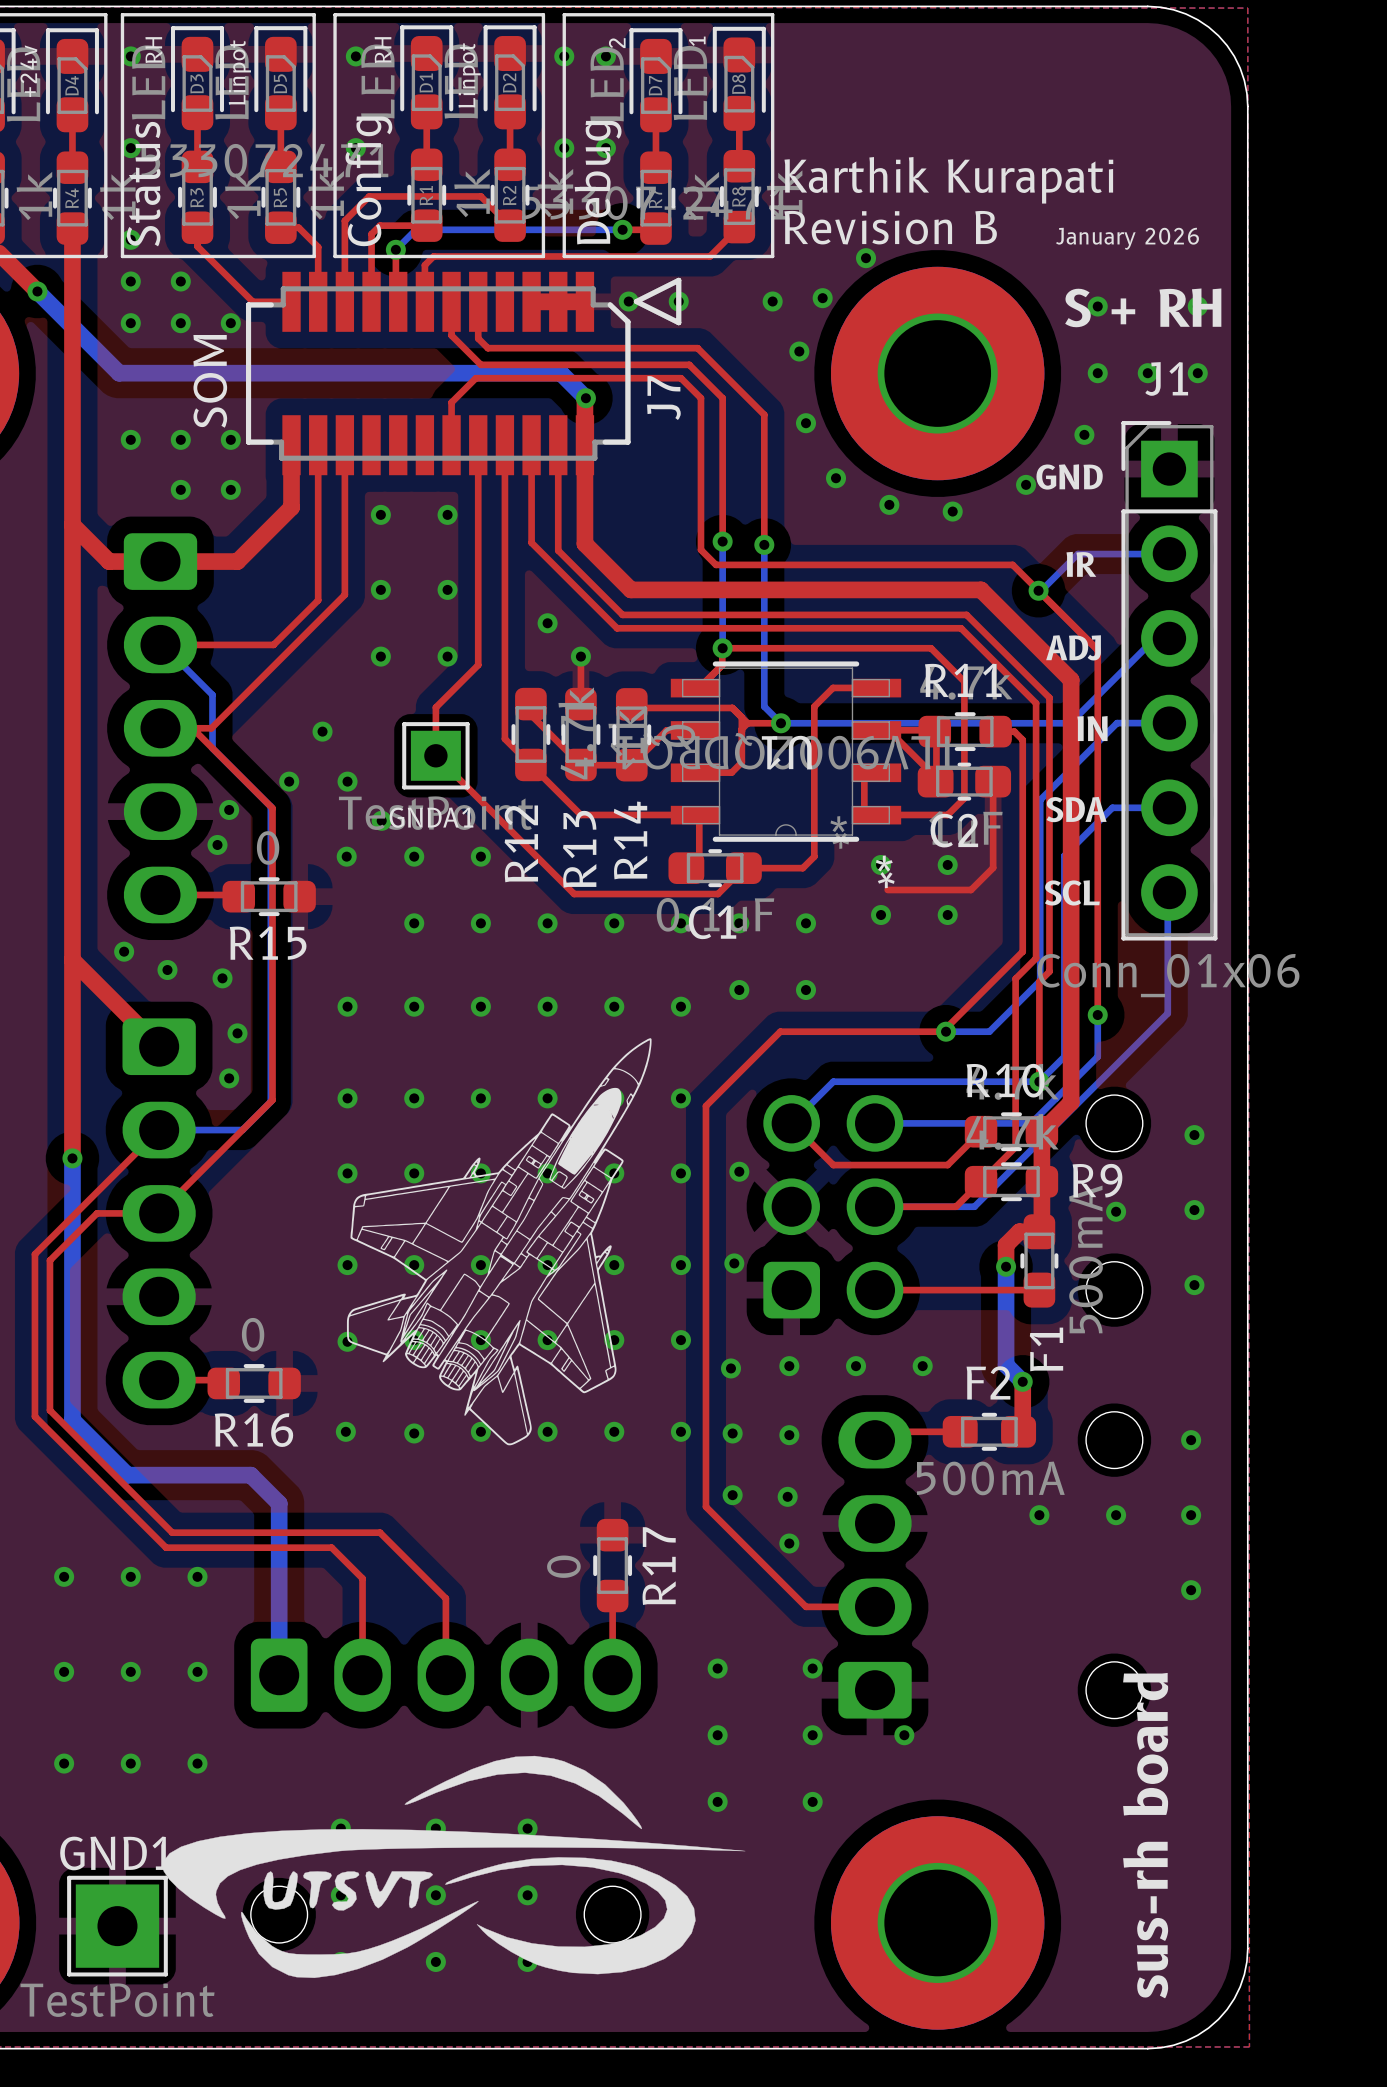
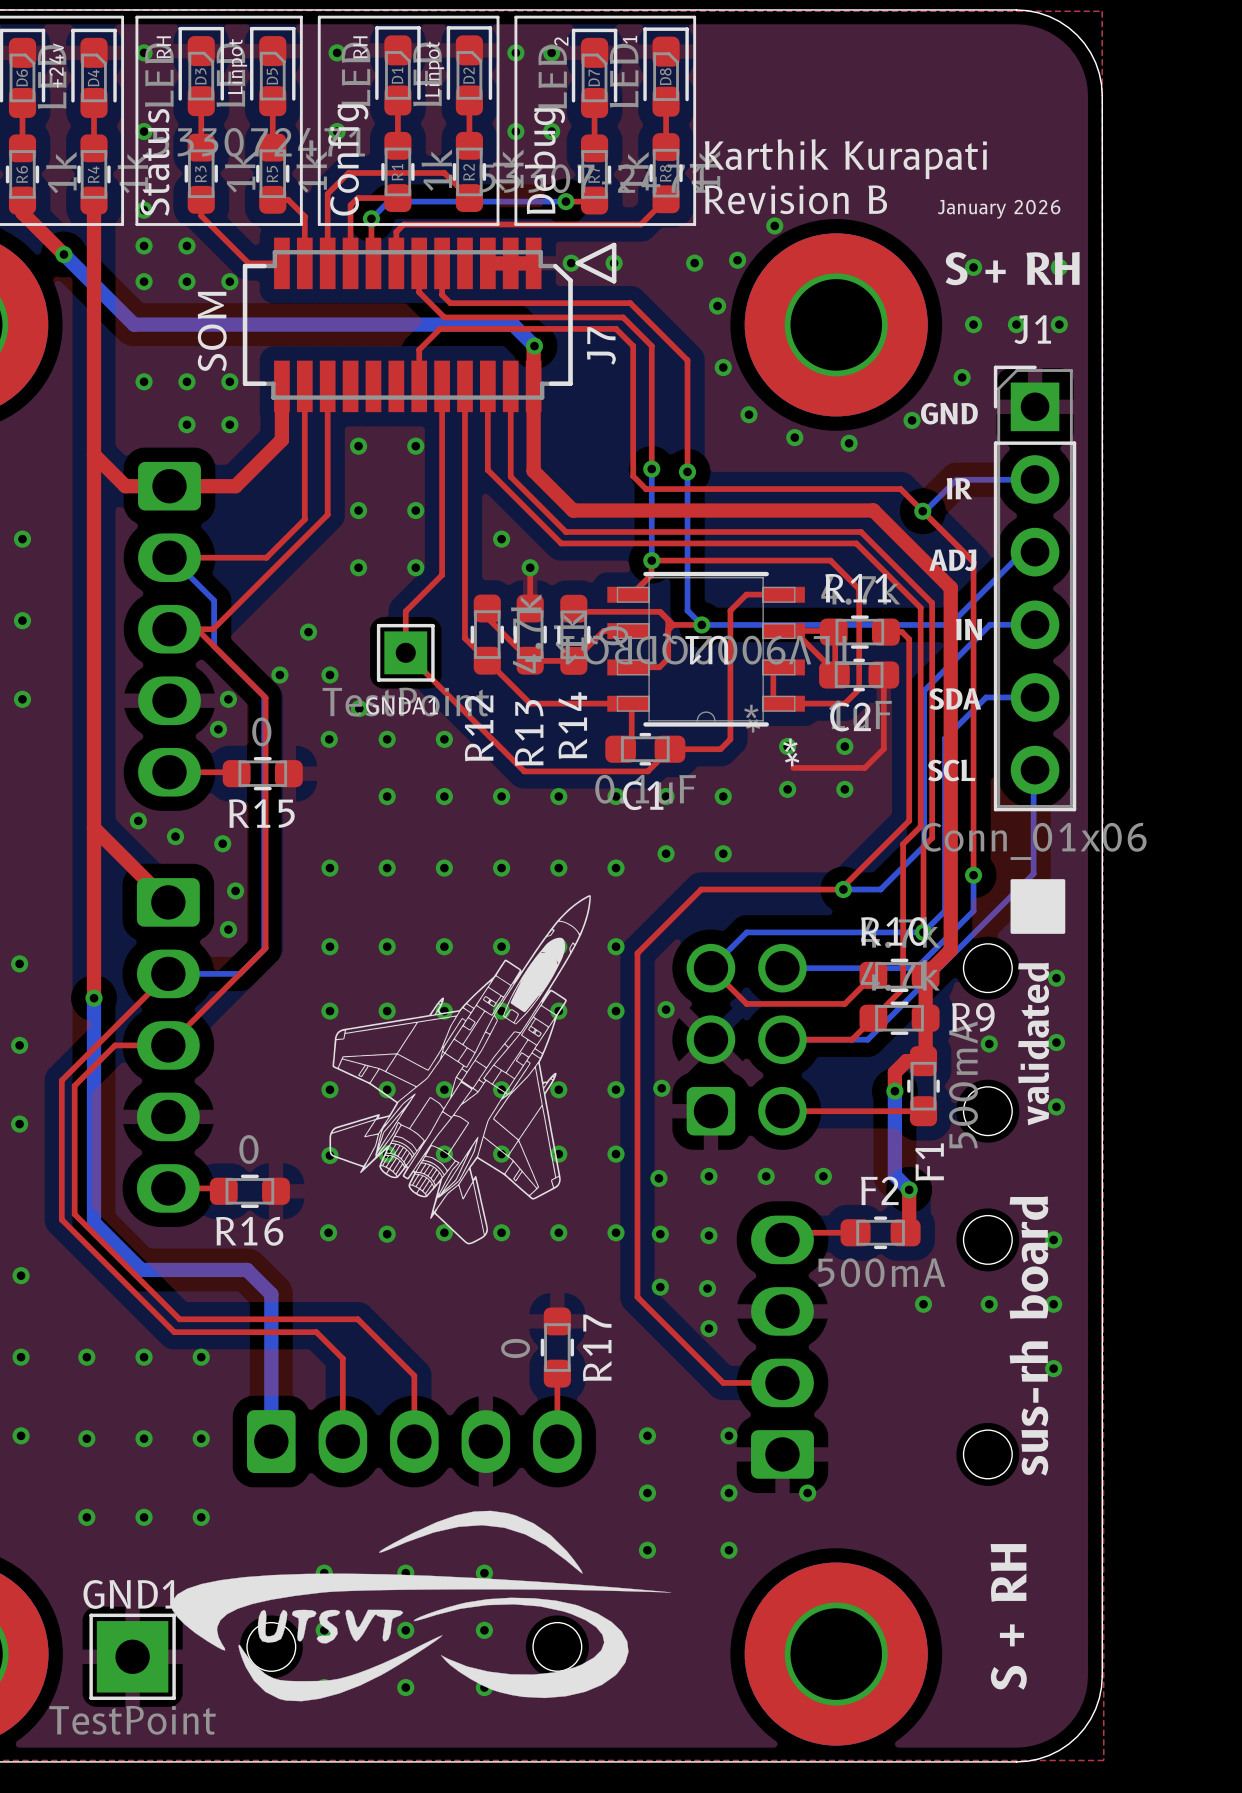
drawing: none -> [1010, 879, 1066, 934]
text: none -> validated (1033, 1044)
text position: sus-rh board (1145, 1835) -> sus-rh board (1028, 1336)
text: none -> S + RH (1008, 1616)

